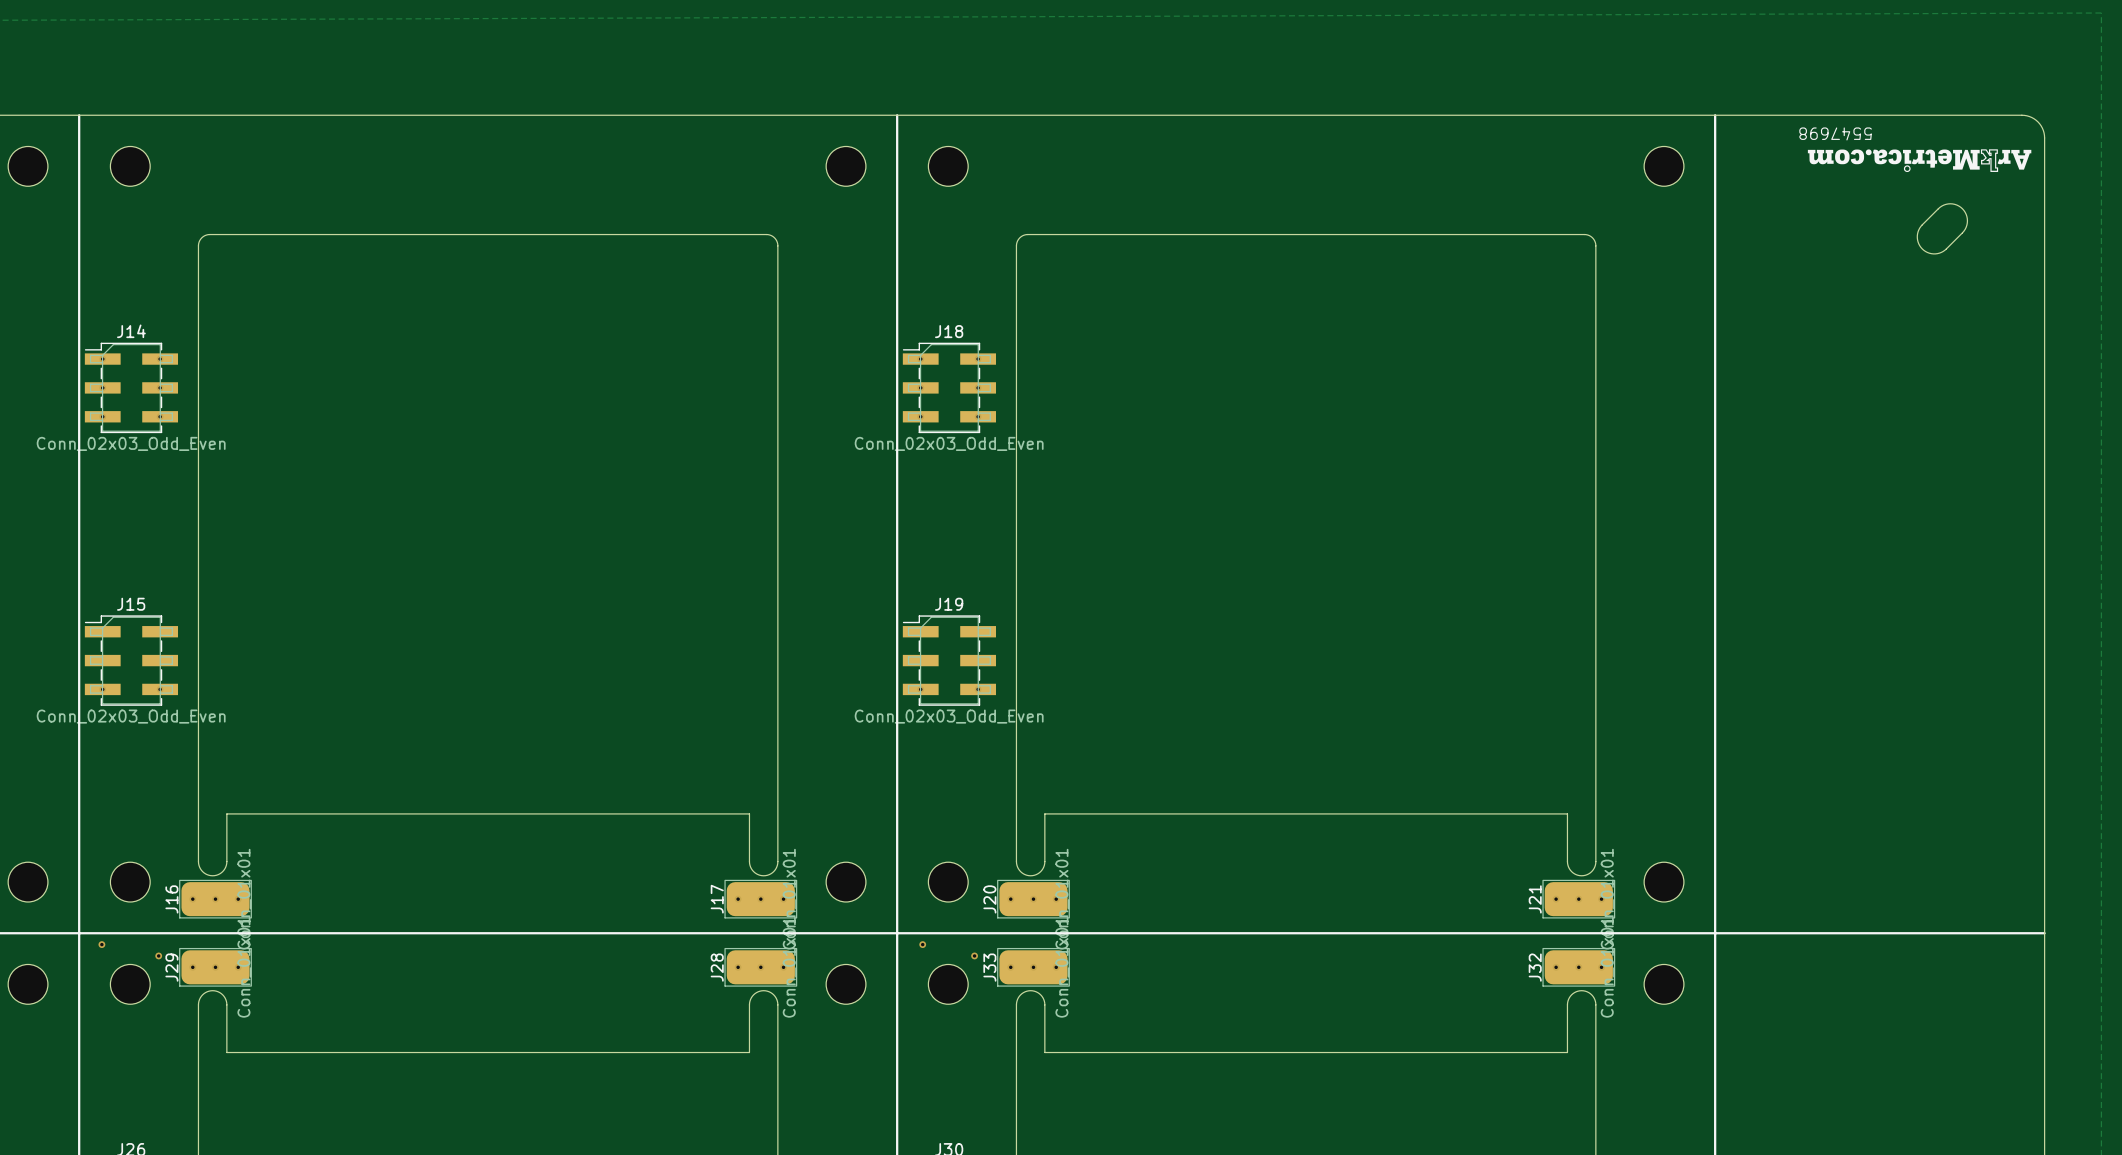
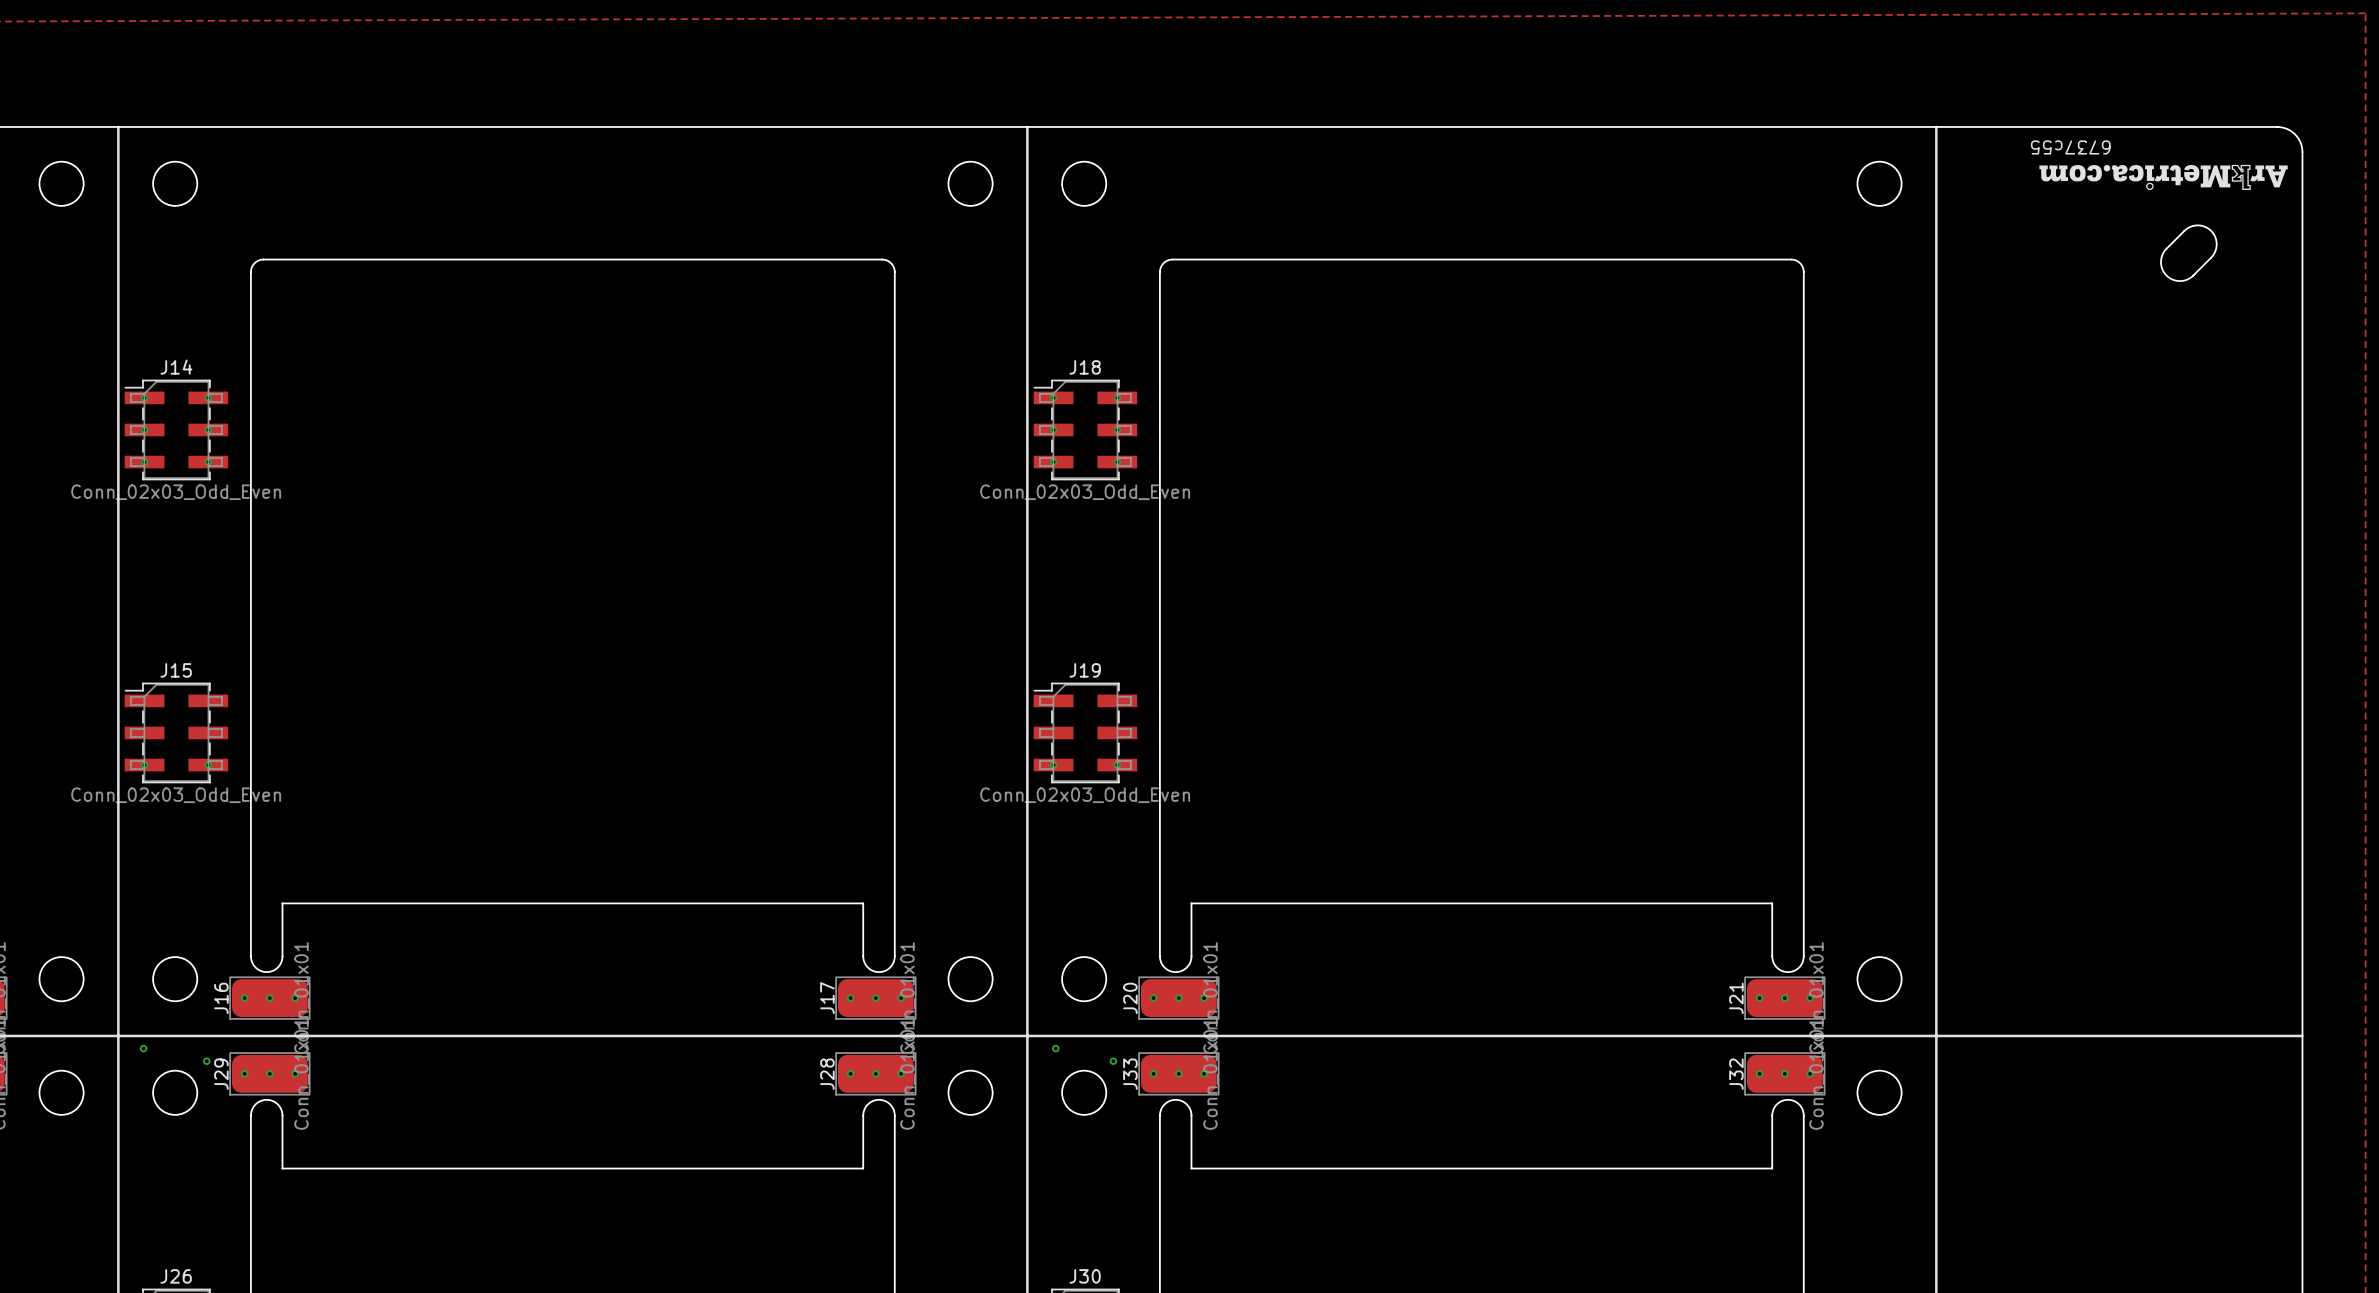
text: 5547698 (1835, 133) -> 6737c55 (2070, 147)

